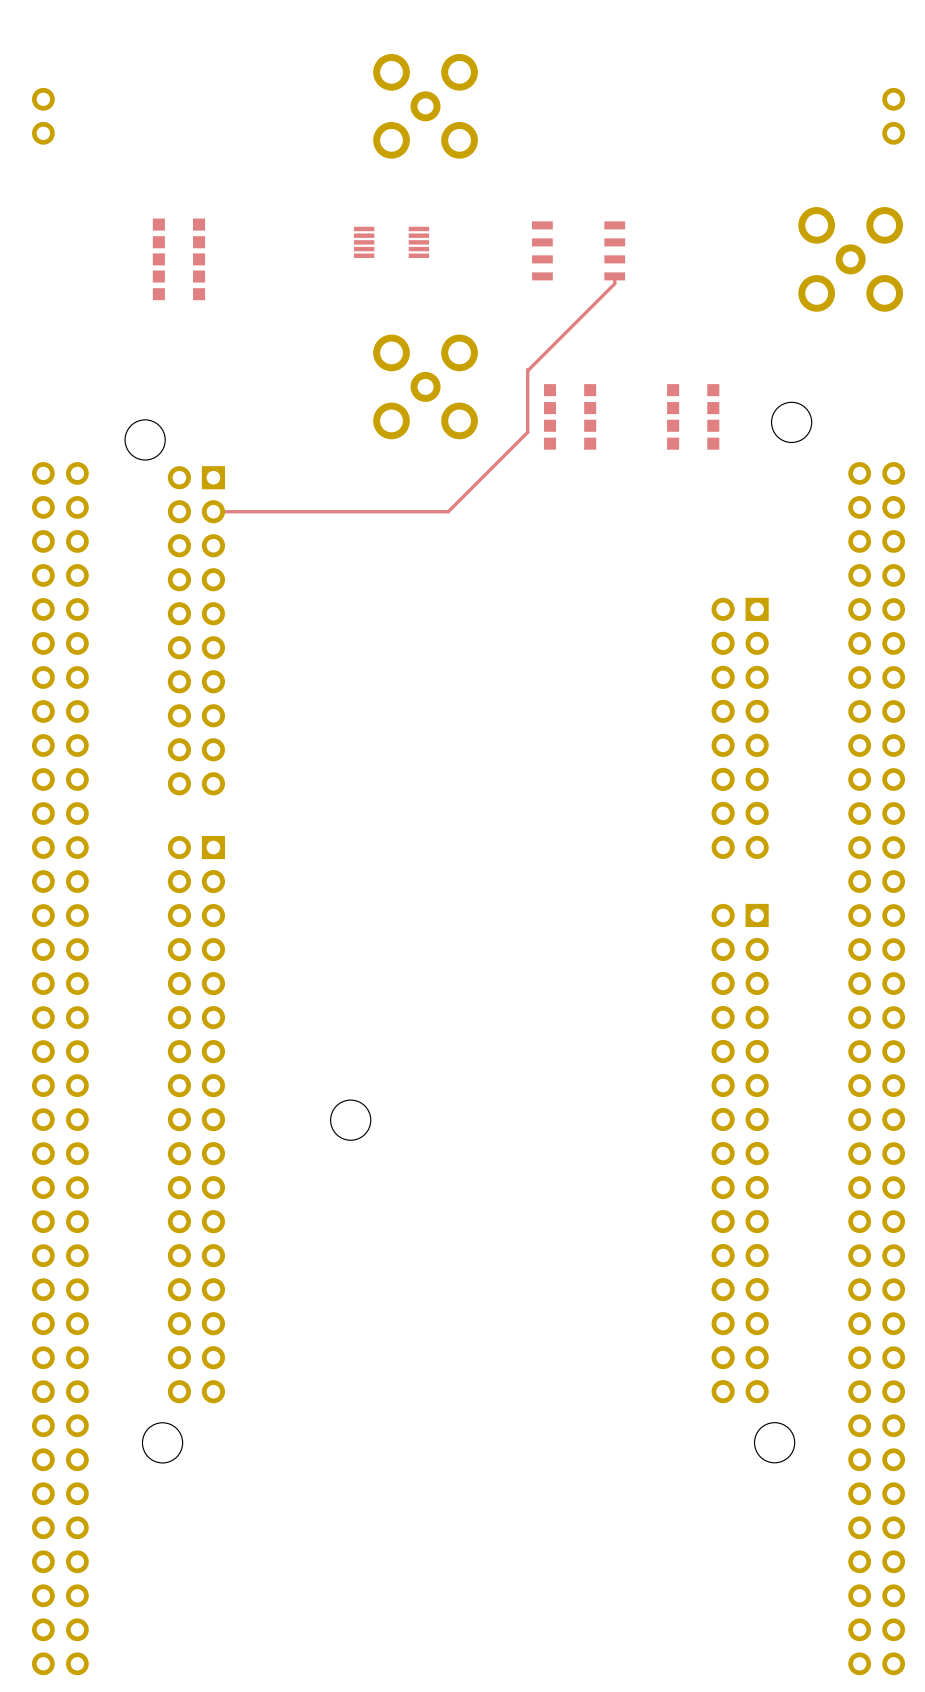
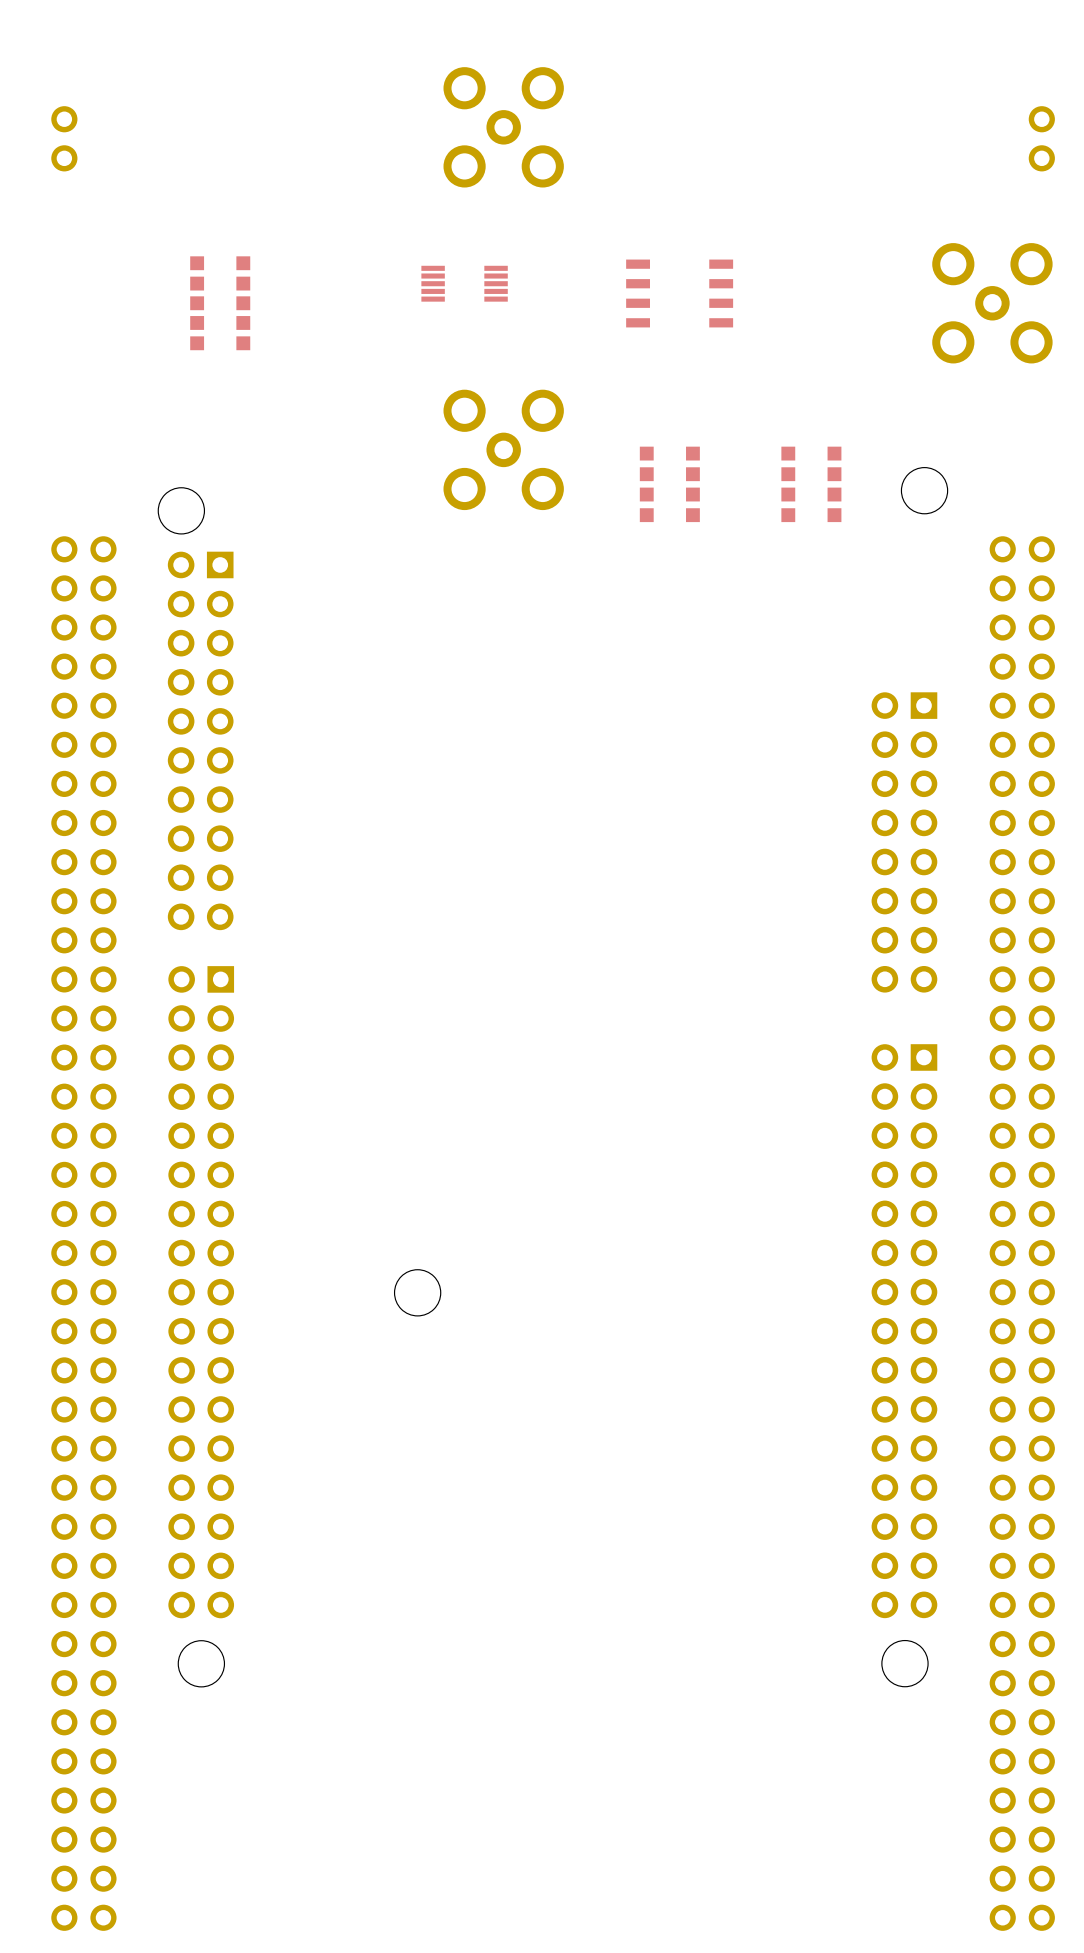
top track: (614, 276) (614, 283) (527, 369) (527, 432) (448, 511) (213, 511) -> none
part position: (196, 630) -> (200, 740)
part position: (740, 728) -> (904, 842)
part position: (196, 1119) -> (201, 1292)
part position: (740, 1153) -> (904, 1331)

